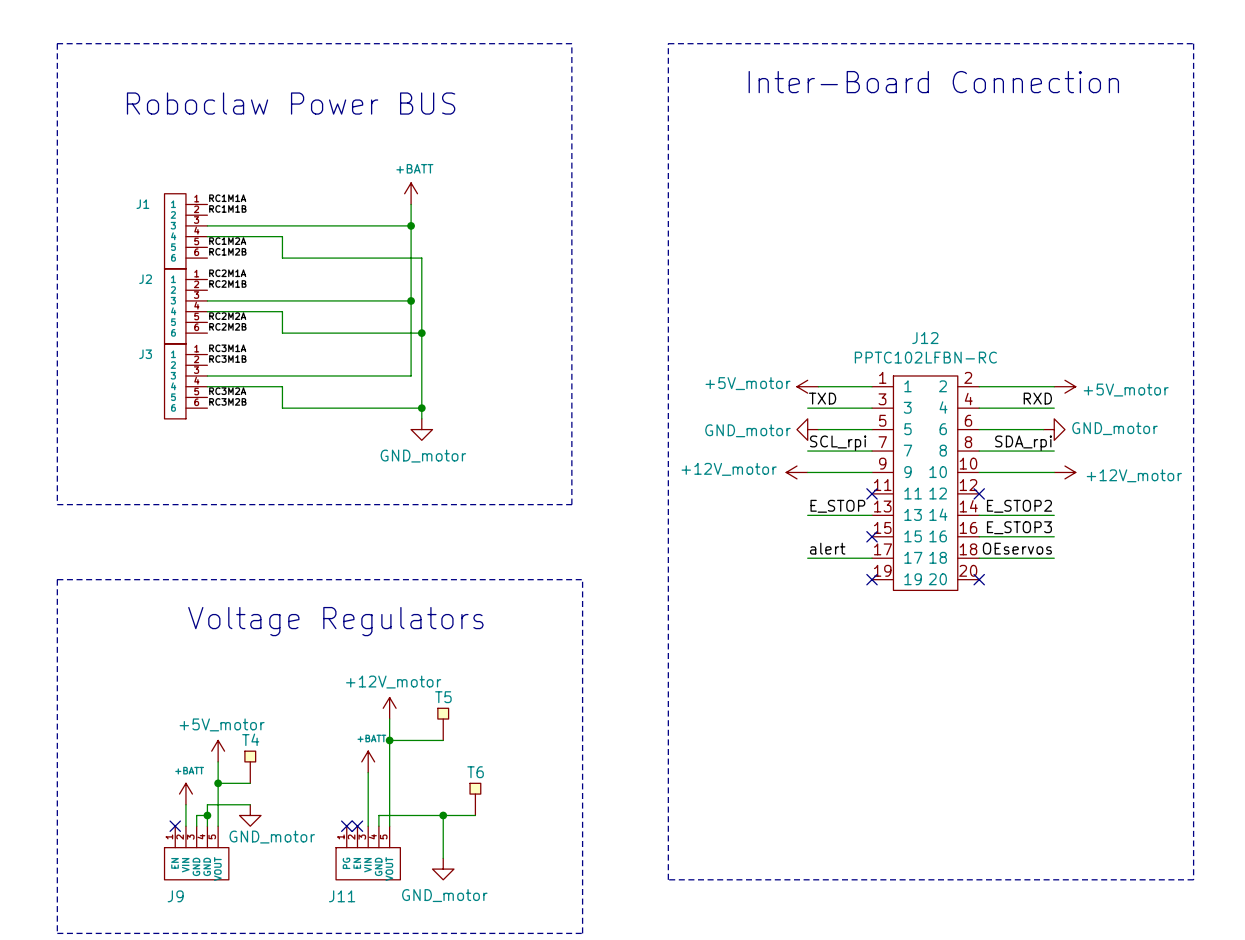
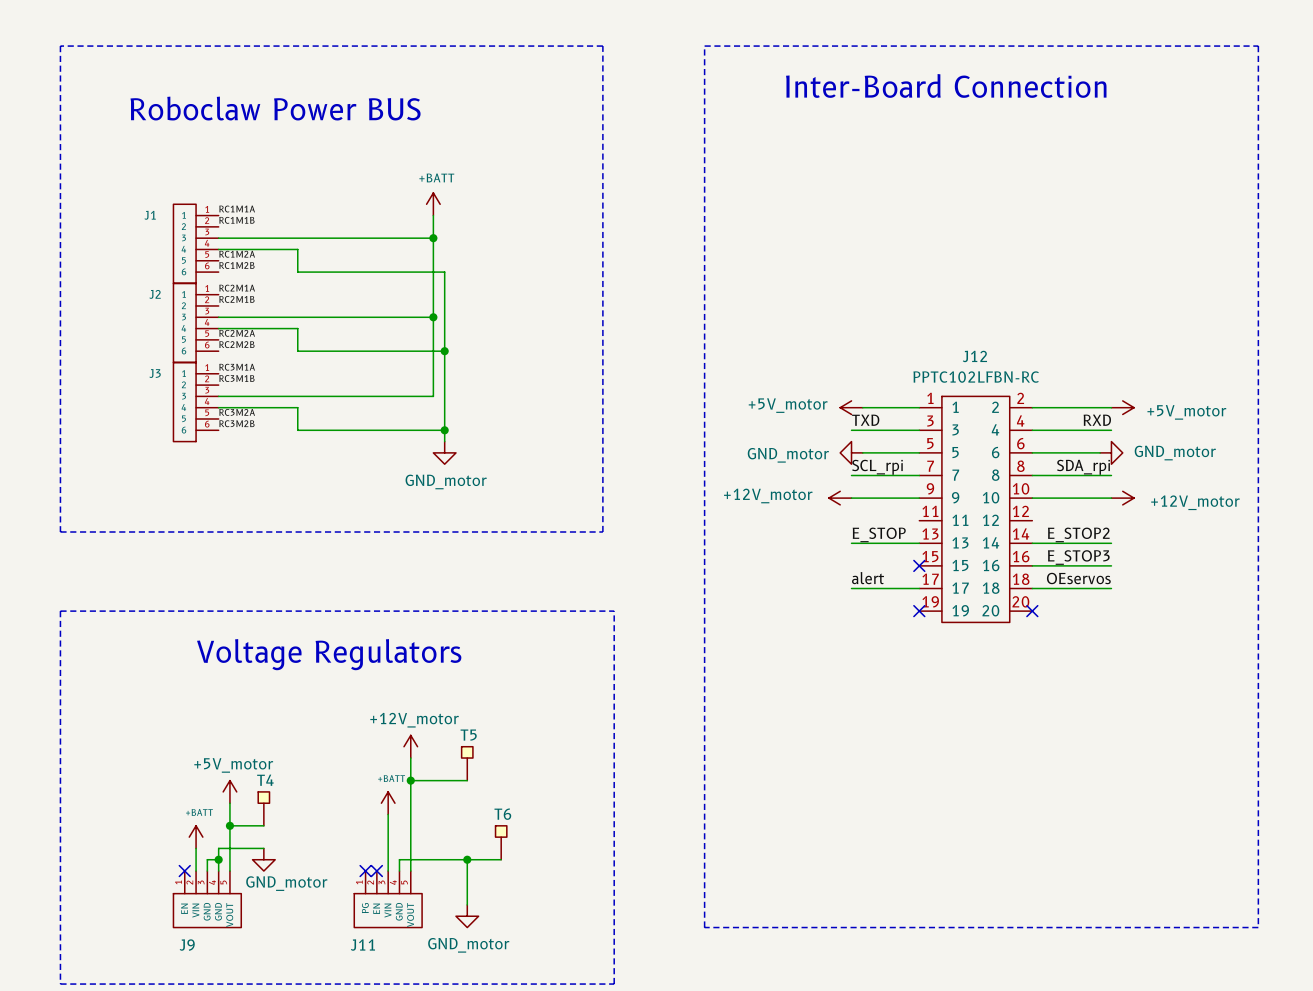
no-connect mark: (872, 493) -> none
no-connect mark: (979, 493) -> none

